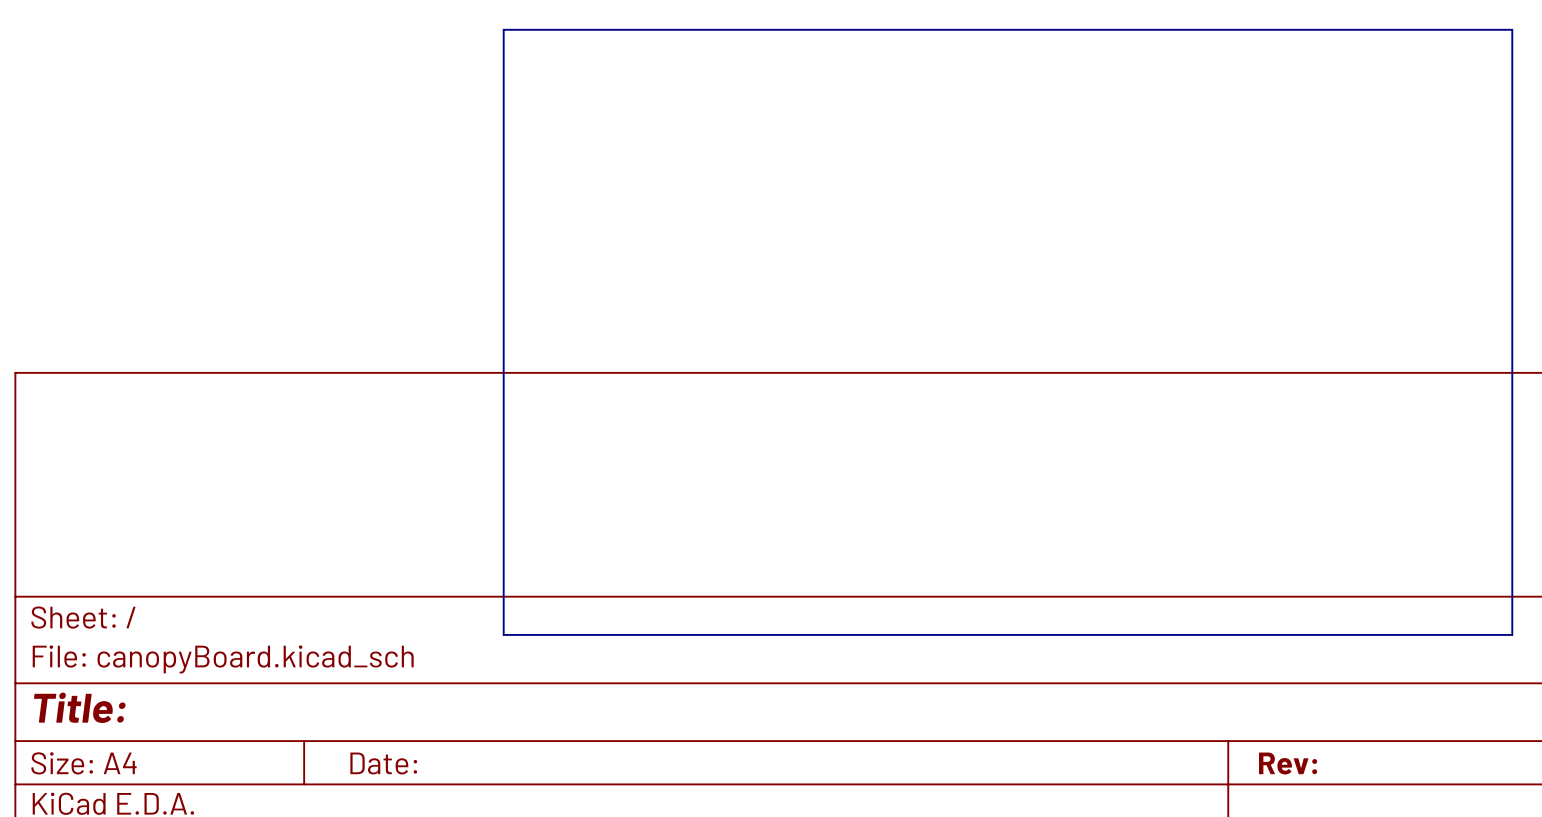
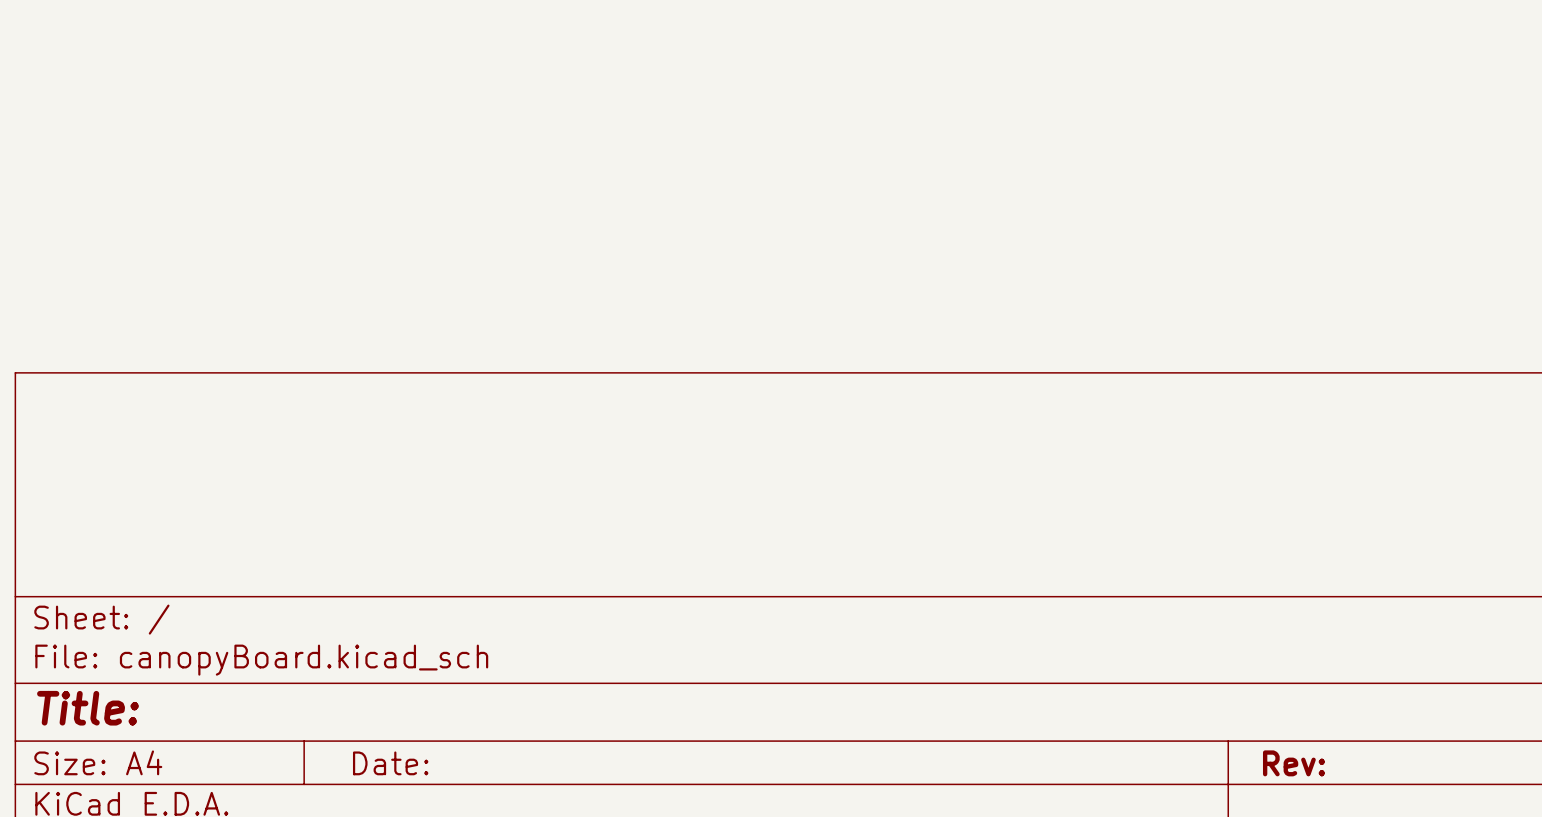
line: (503, 29) (1512, 29) (1512, 634) (503, 634) (503, 29) -> none

